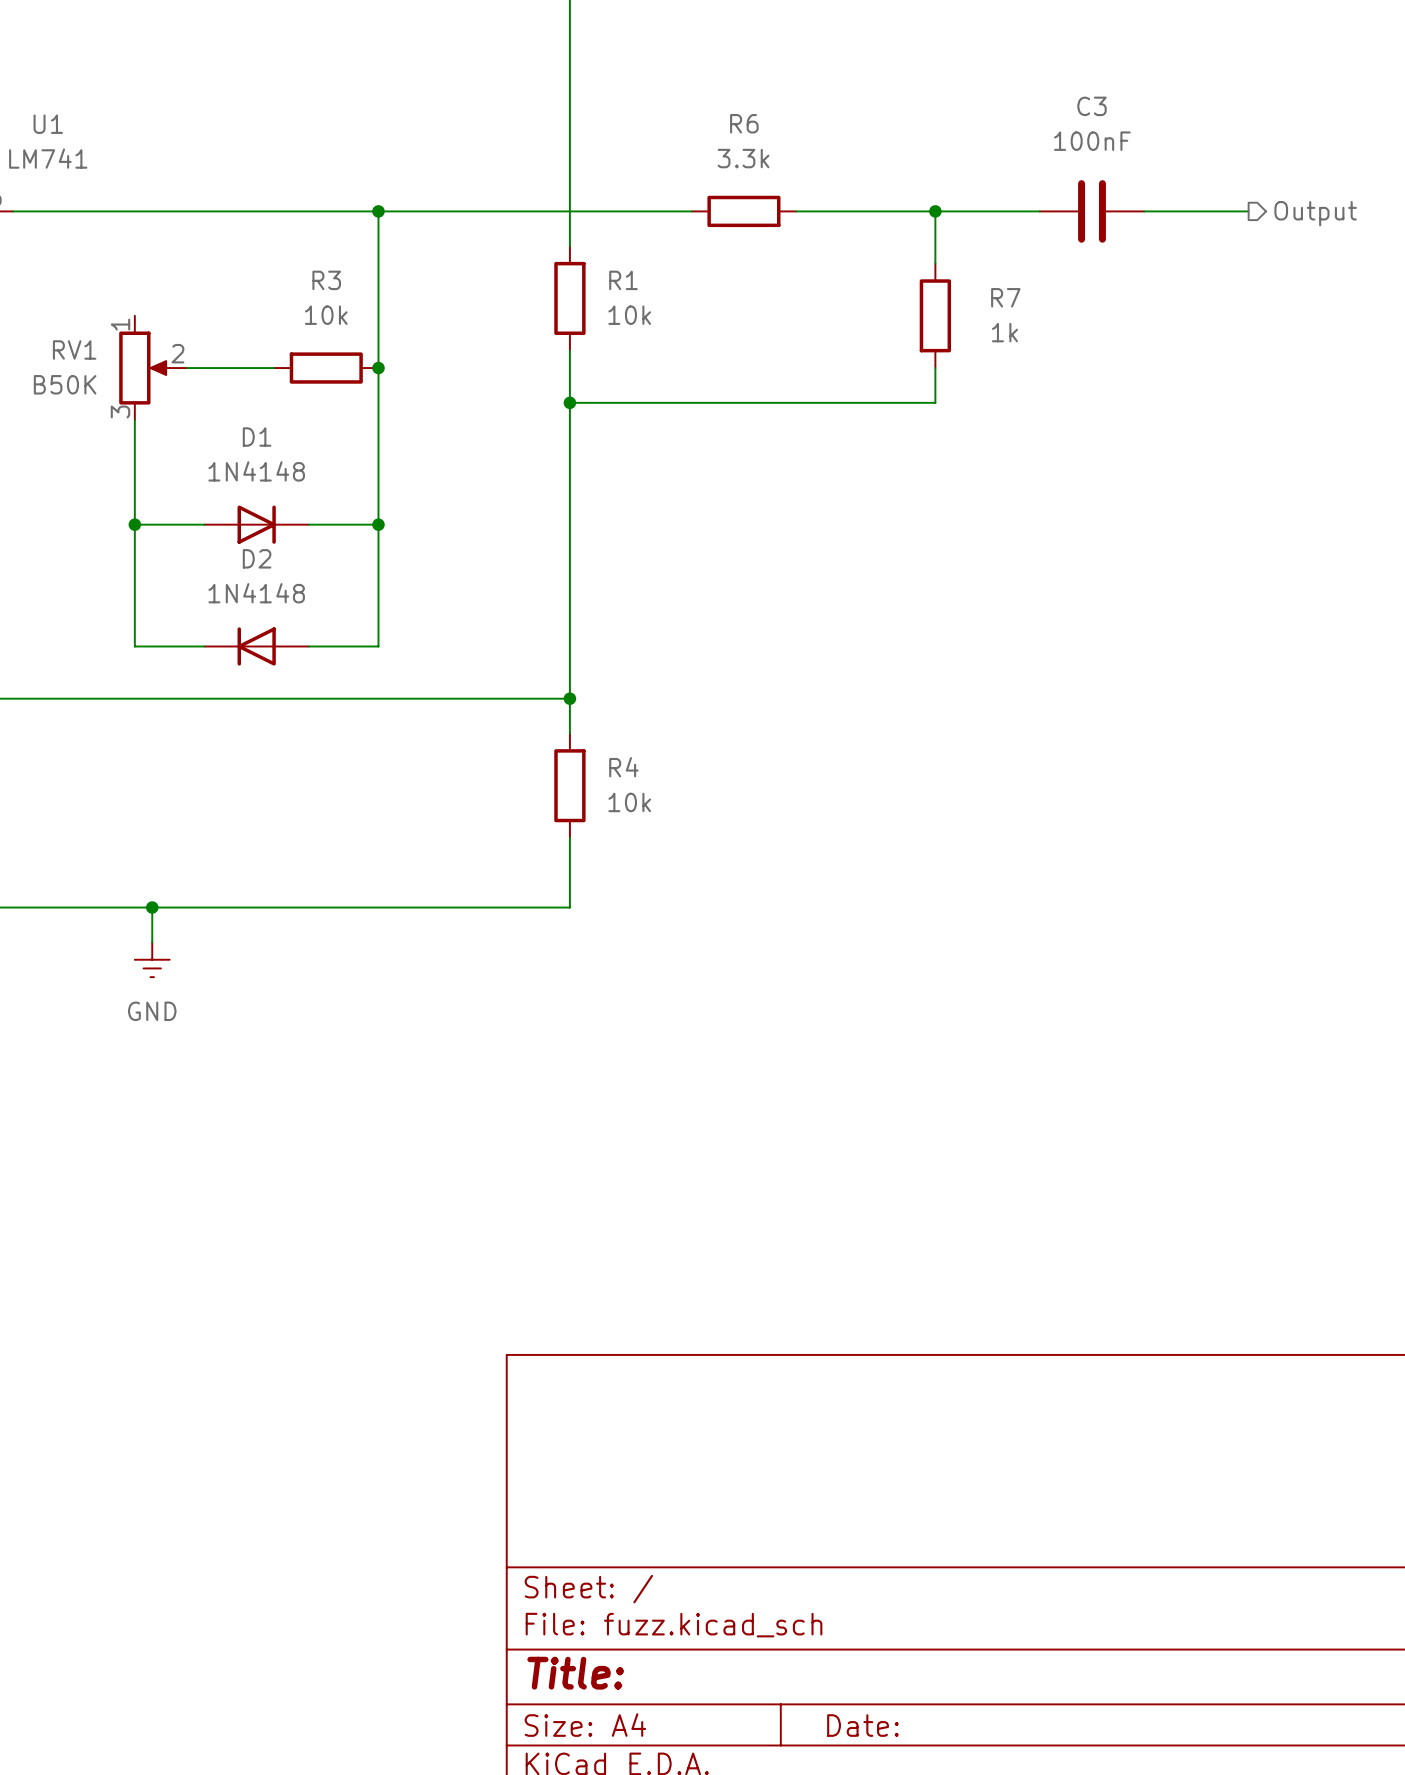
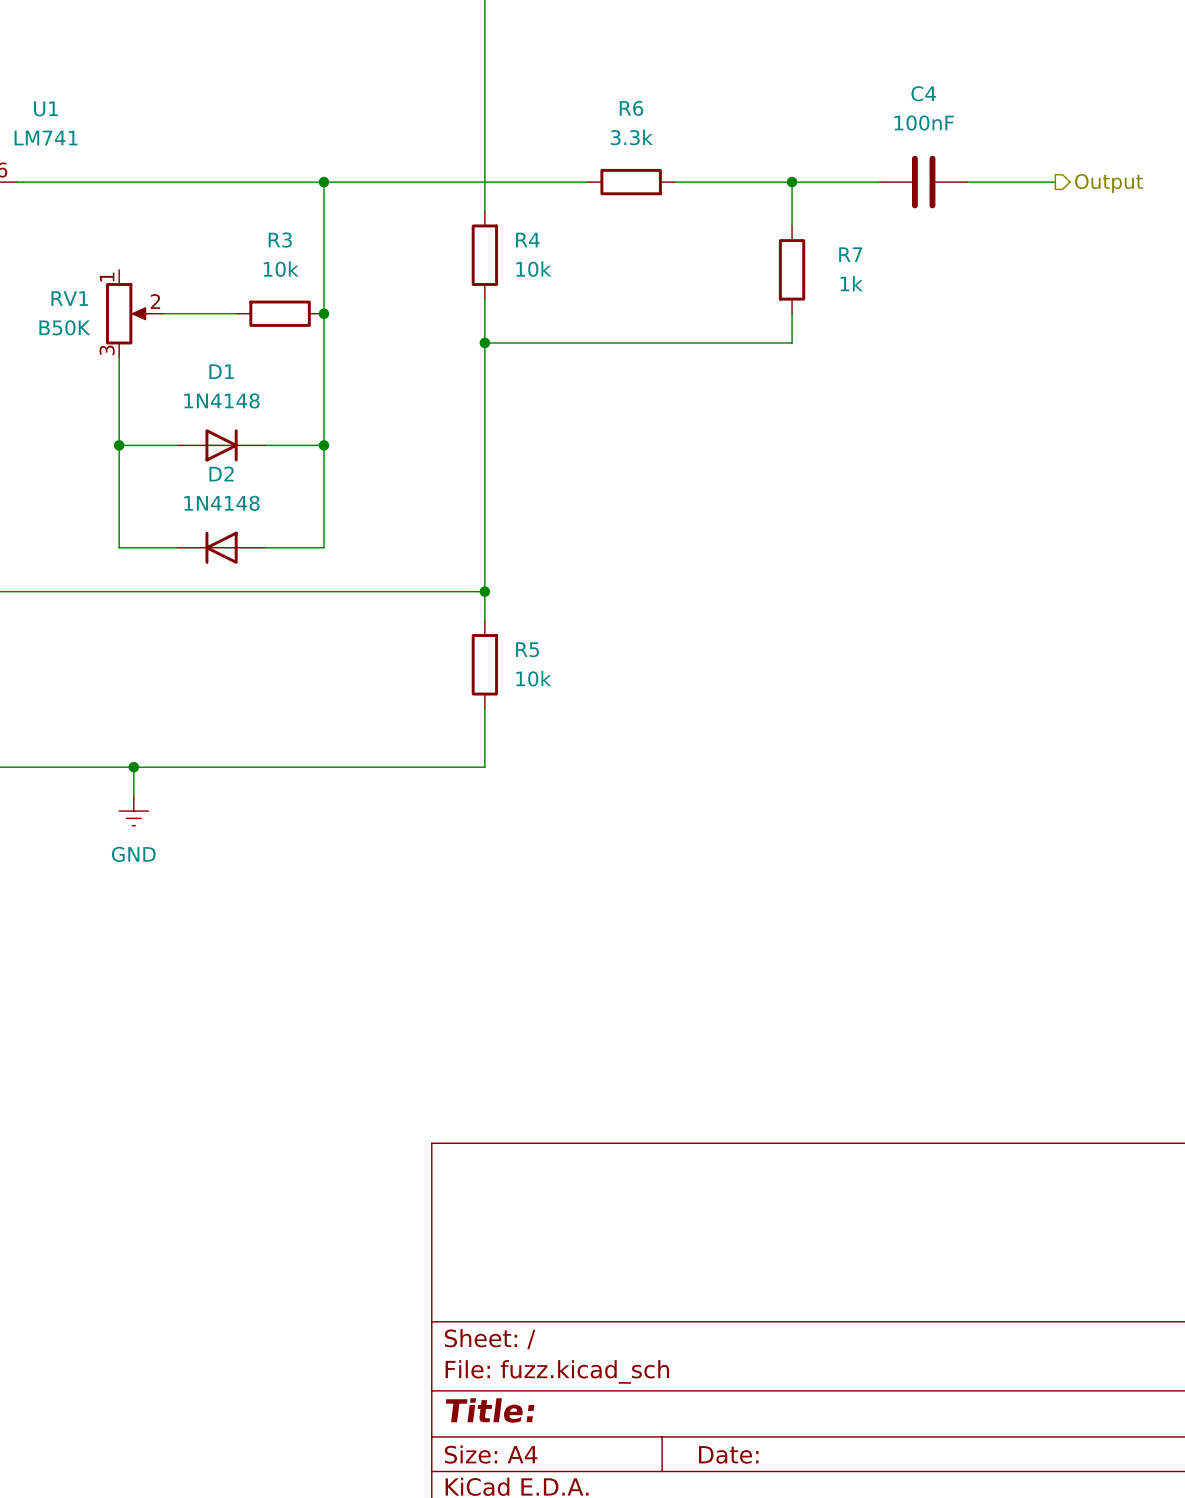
C3 name: C3 (1092, 106) -> C4 (923, 93)
R1 name: R1 (623, 280) -> R4 (527, 240)
R4 name: R4 (623, 767) -> R5 (527, 649)

